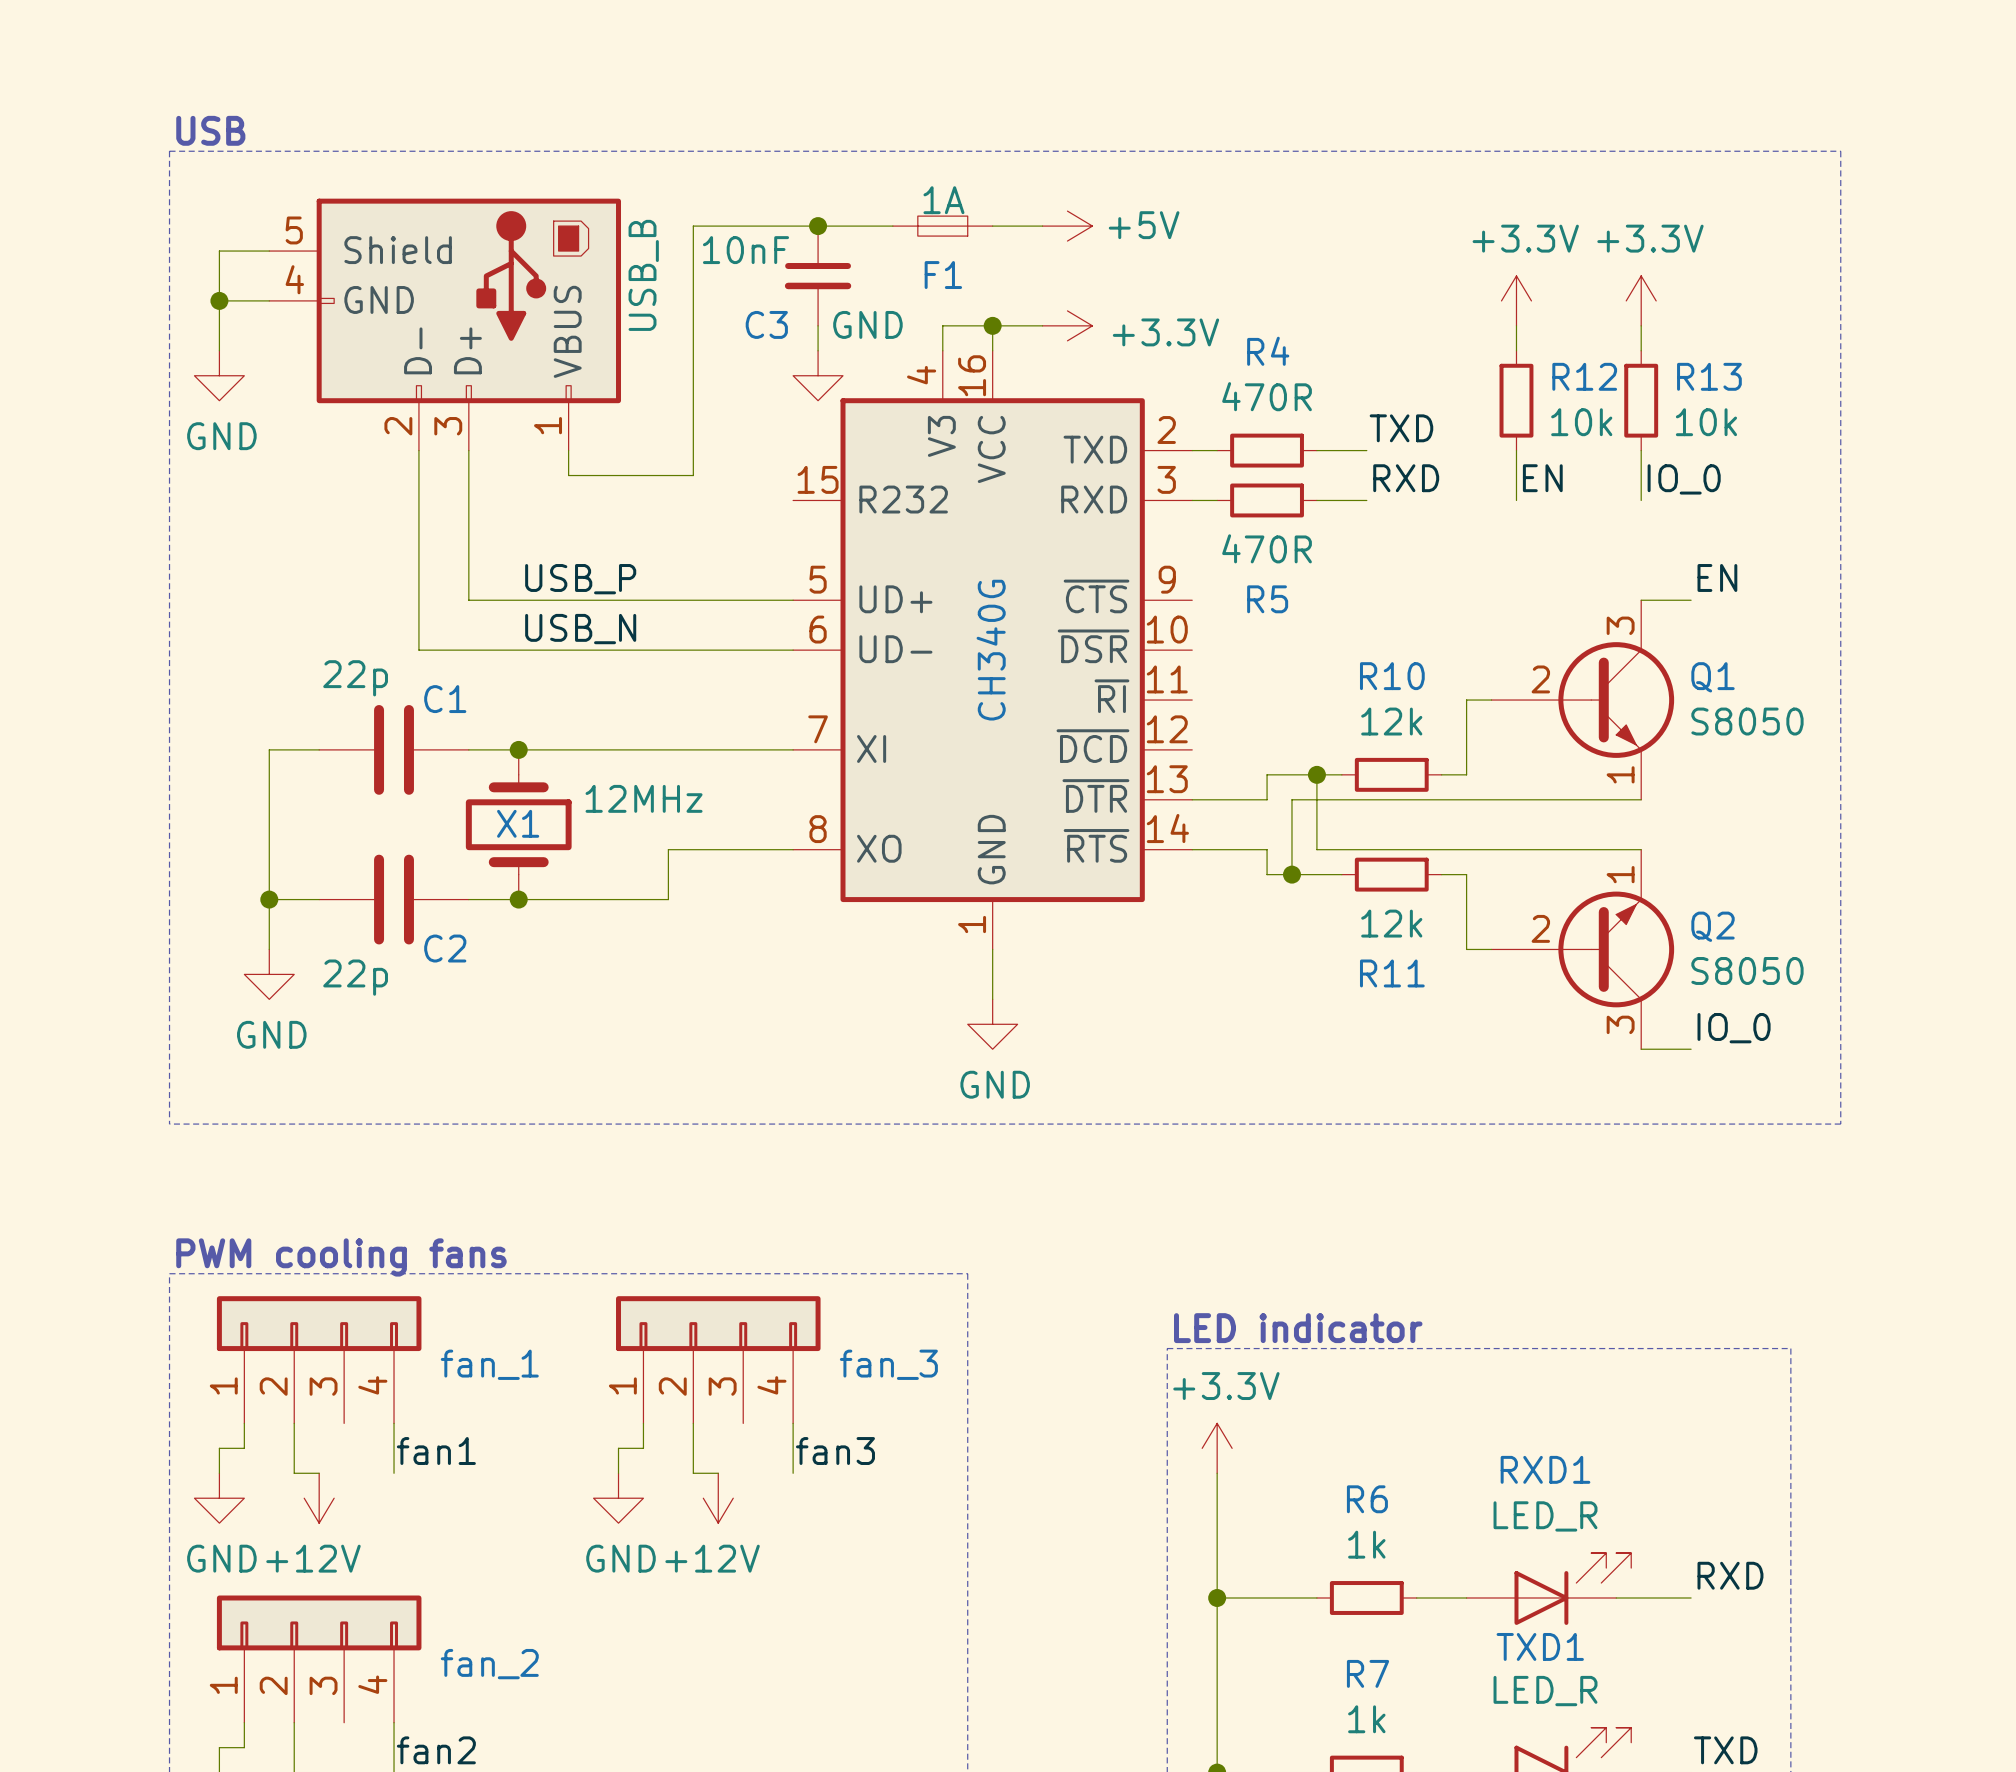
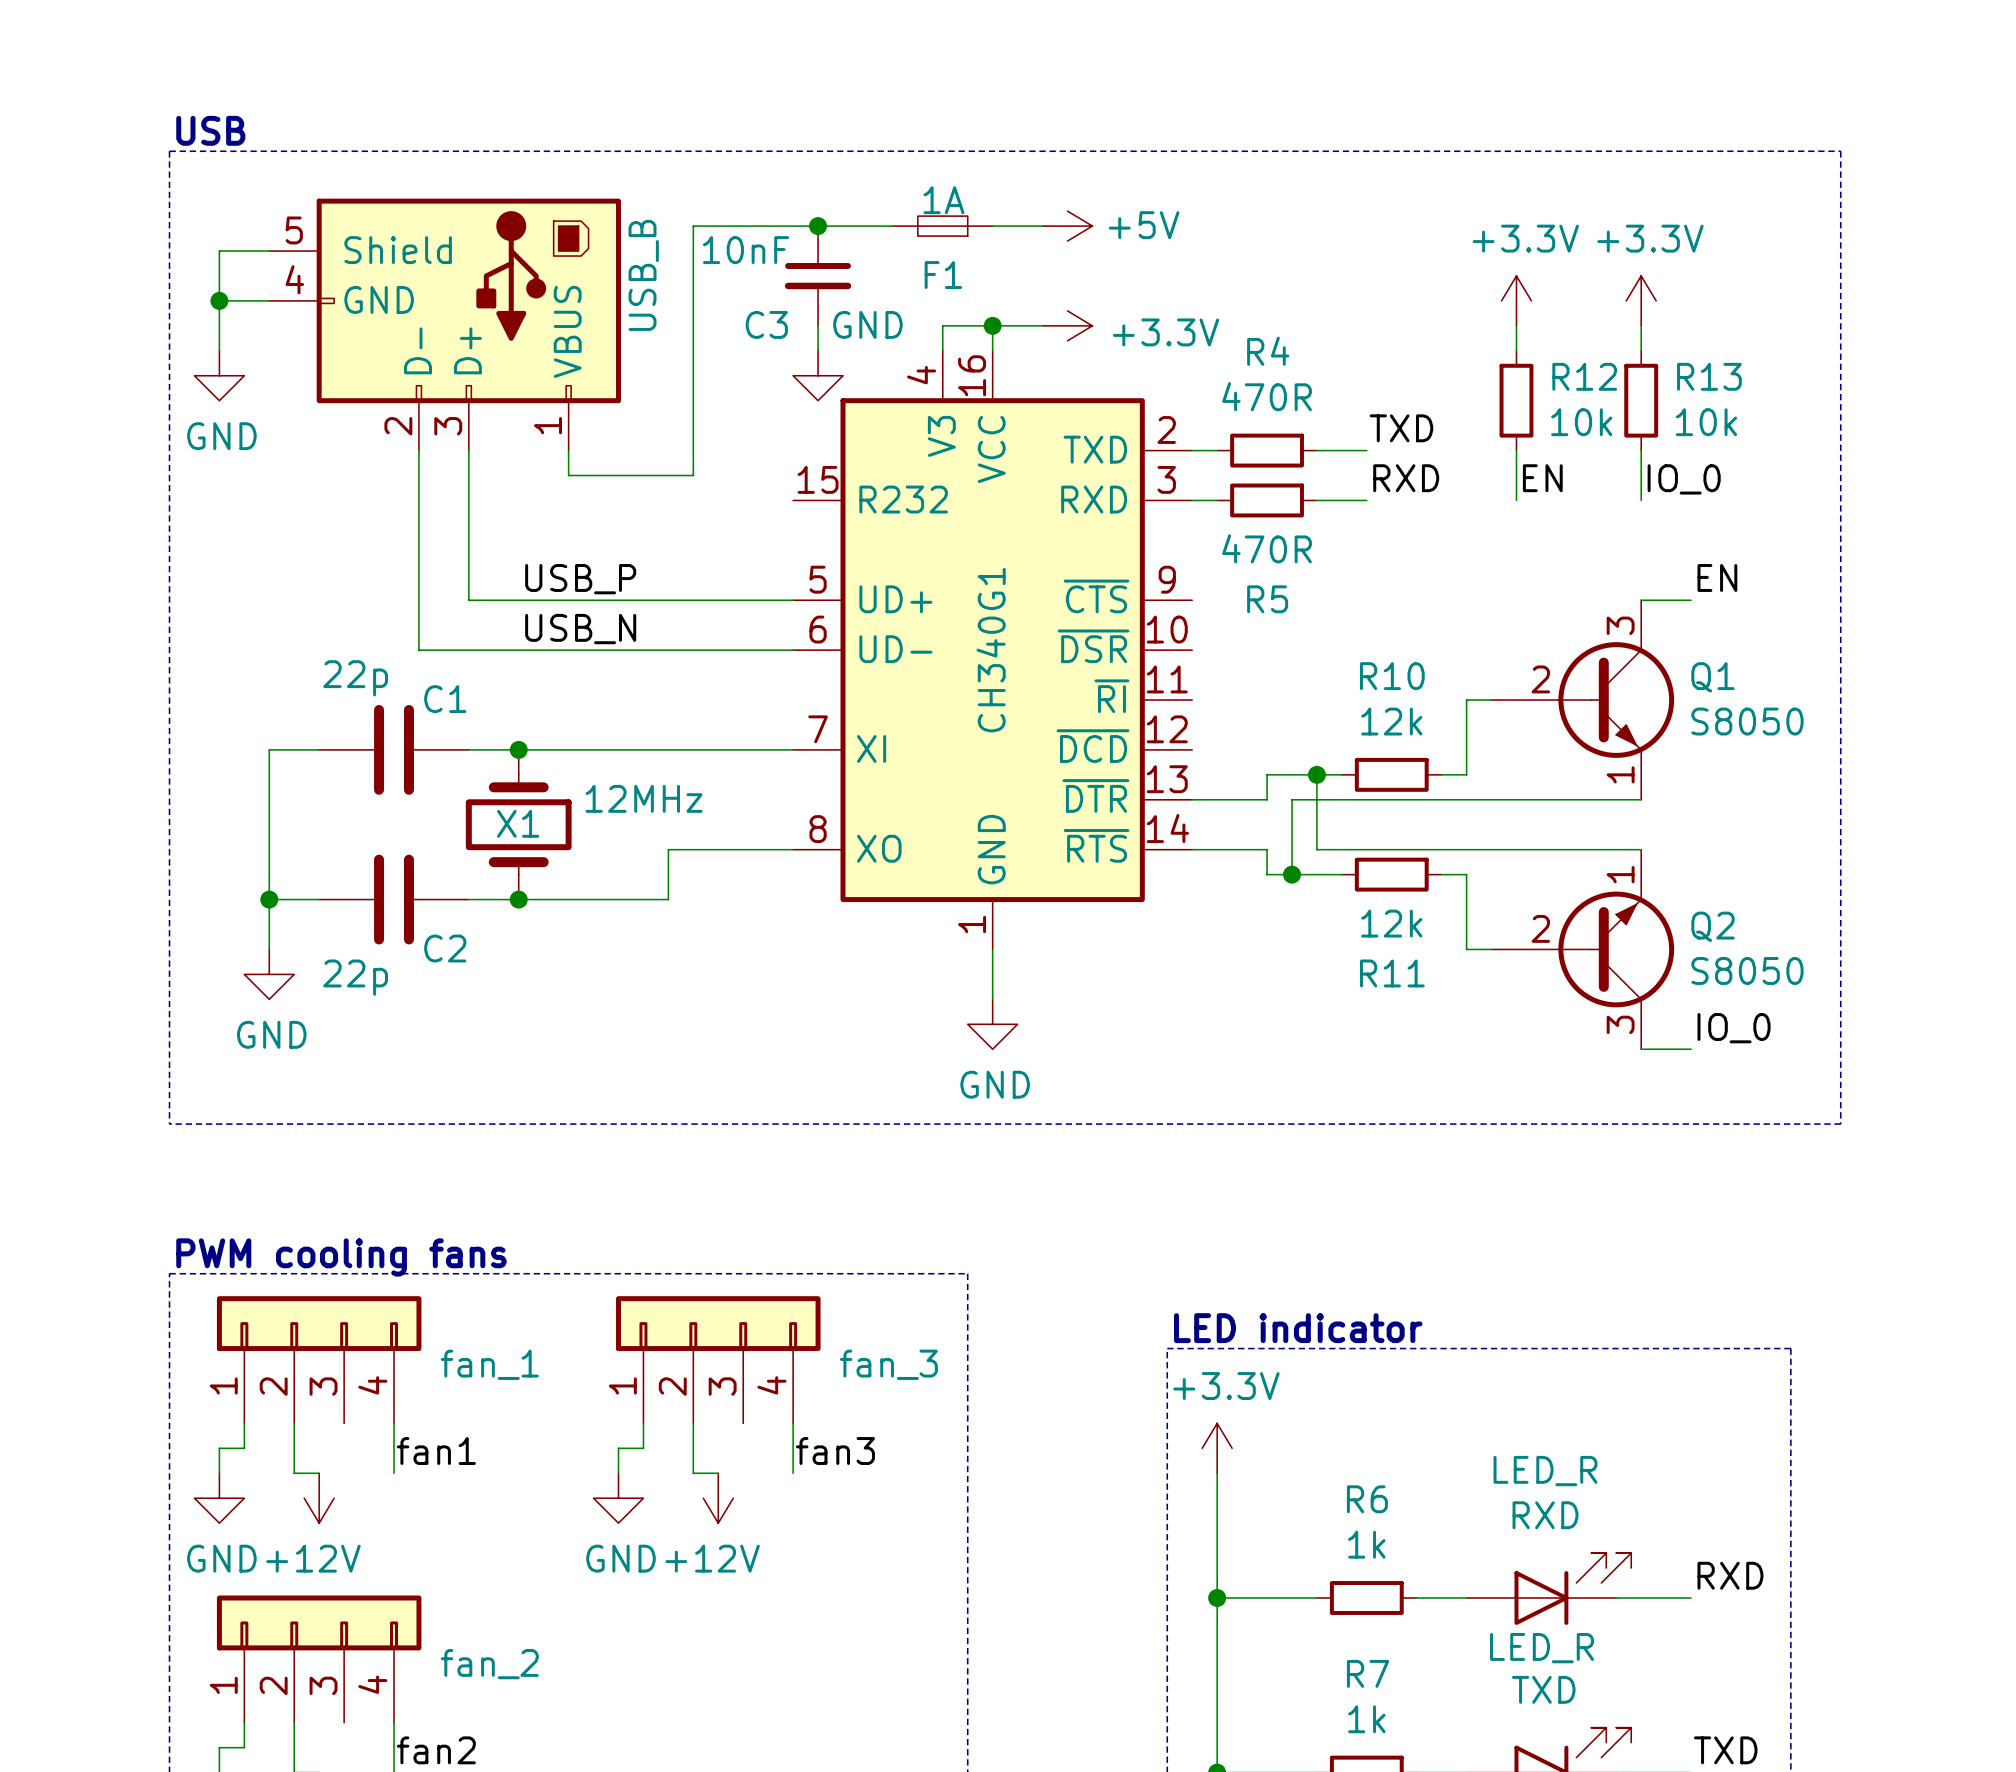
CH340G name: CH340G (991, 650) -> CH340G1 (991, 650)
RXD1 name: RXD1 (1545, 1469) -> LED_R (1545, 1471)
RXD1 value: LED_R (1545, 1516) -> RXD (1545, 1515)
TXD1 name: TXD1 (1540, 1646) -> LED_R (1542, 1648)
TXD1 value: LED_R (1545, 1691) -> TXD (1543, 1689)

